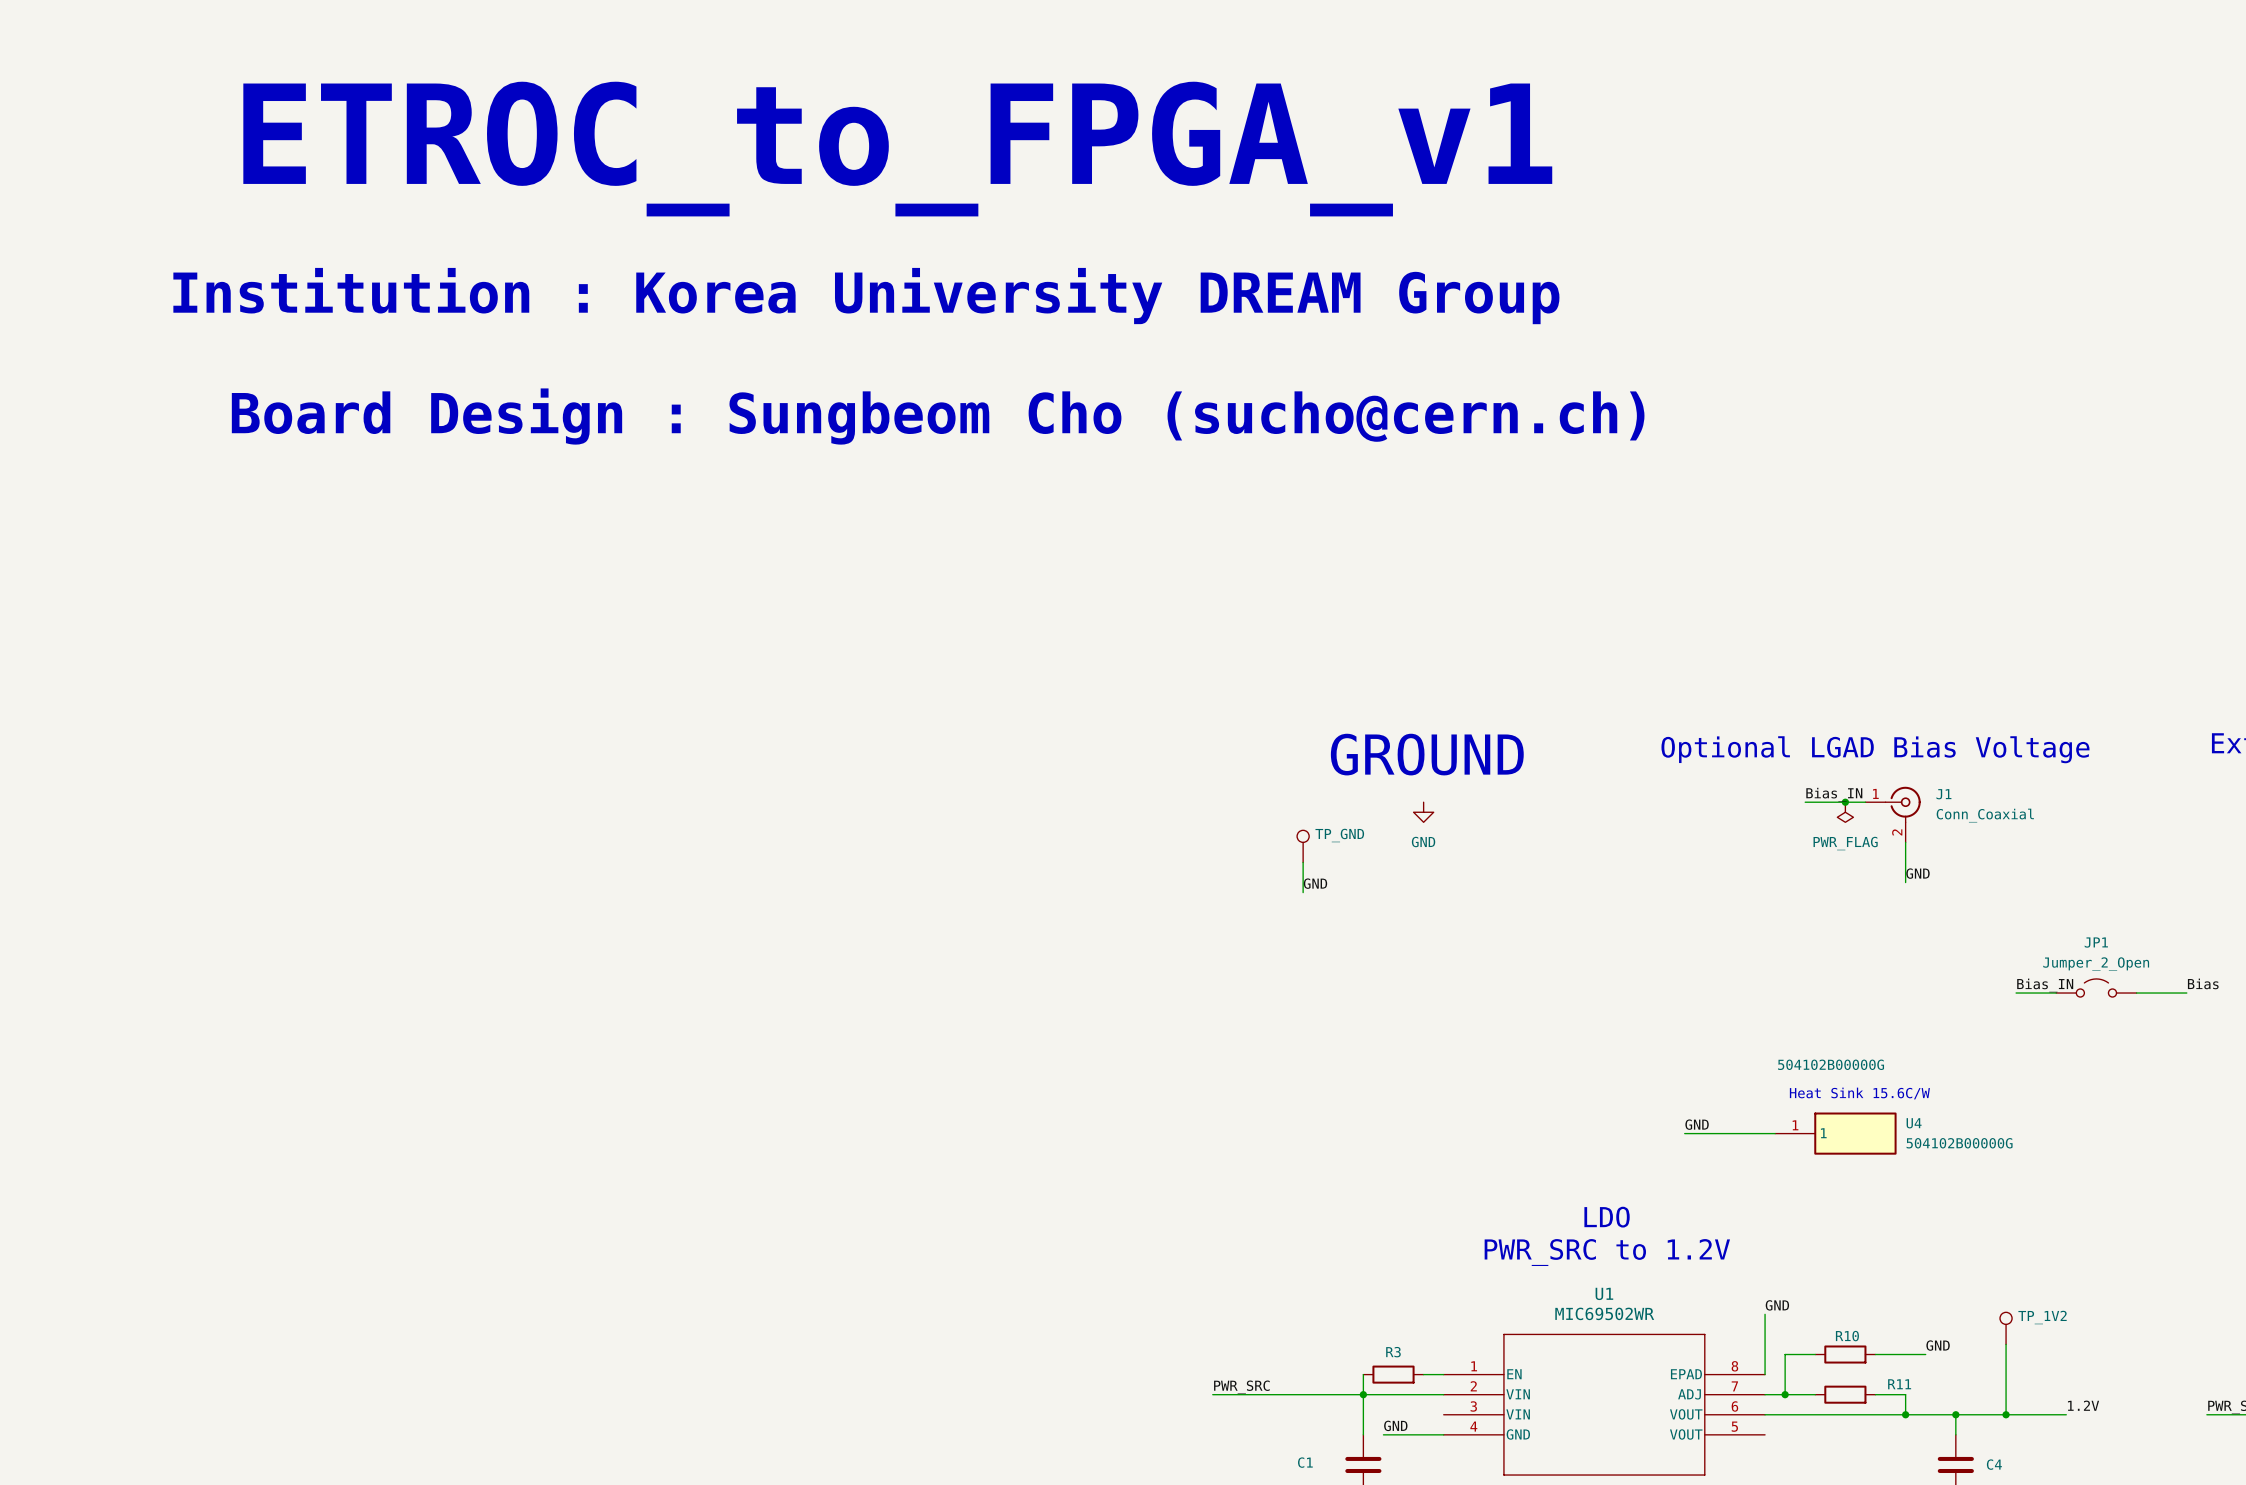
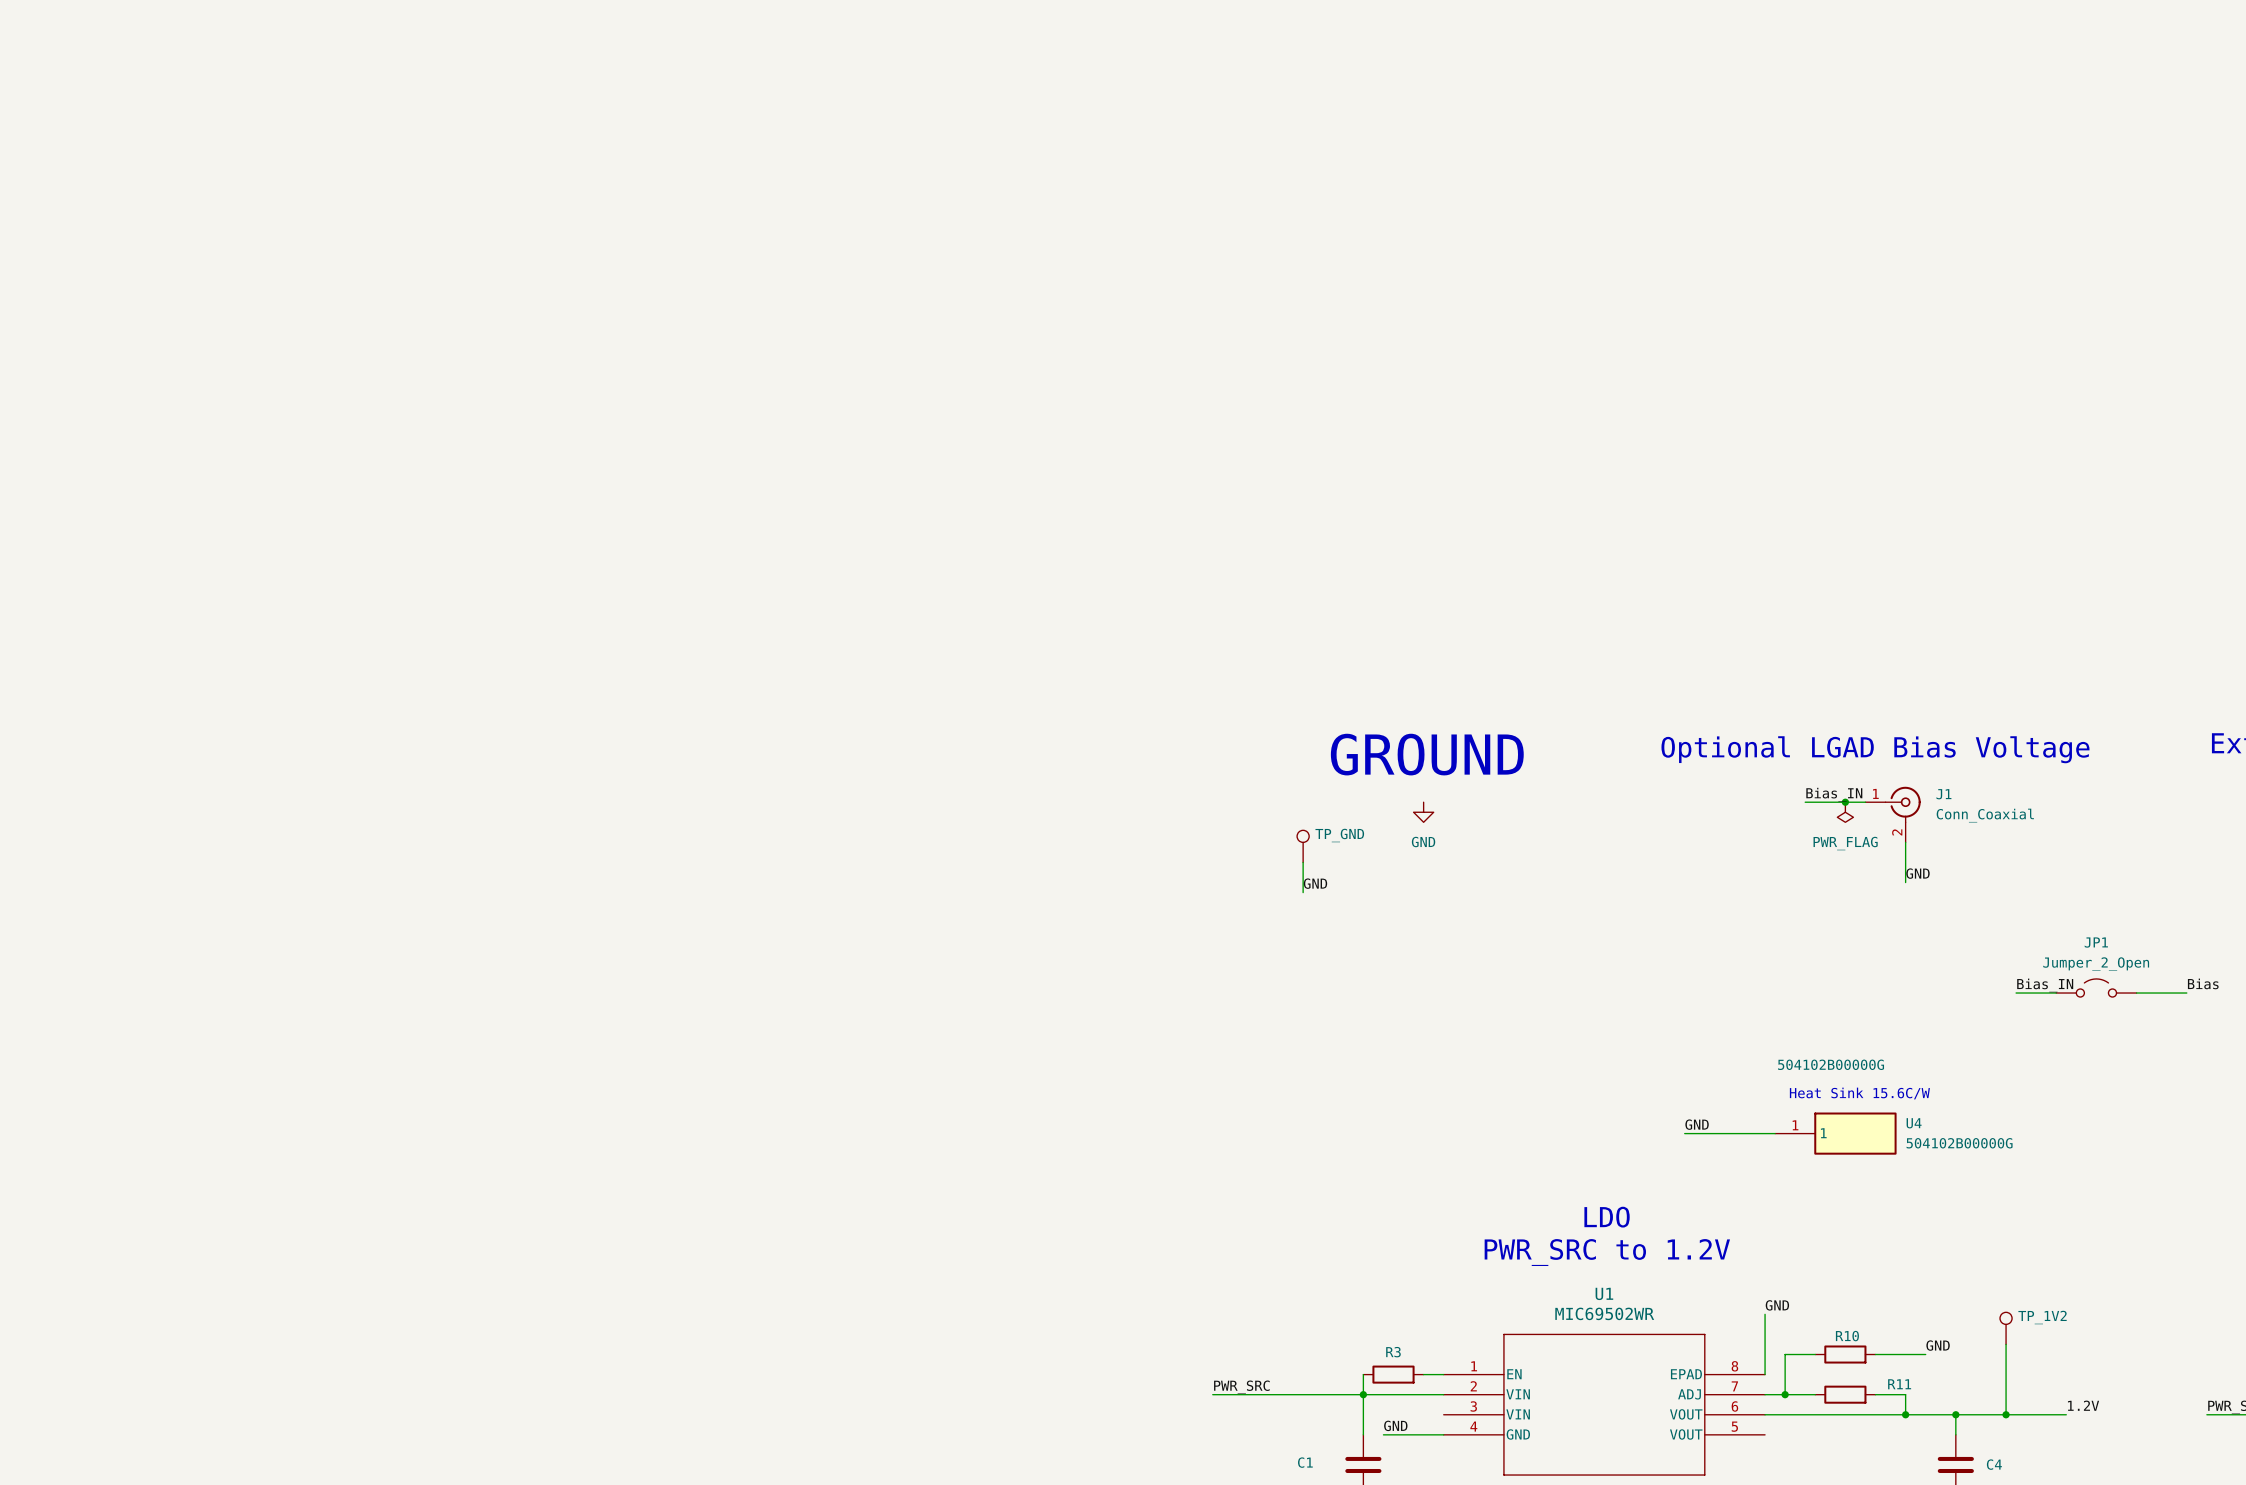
text: ETROC_to_FPGA_v1 (897, 149) -> none
text: Institution : Korea University DREAM Group (866, 296) -> none
text: Board Design : Sungbeom Cho (sucho@cern.ch) (938, 416) -> none

